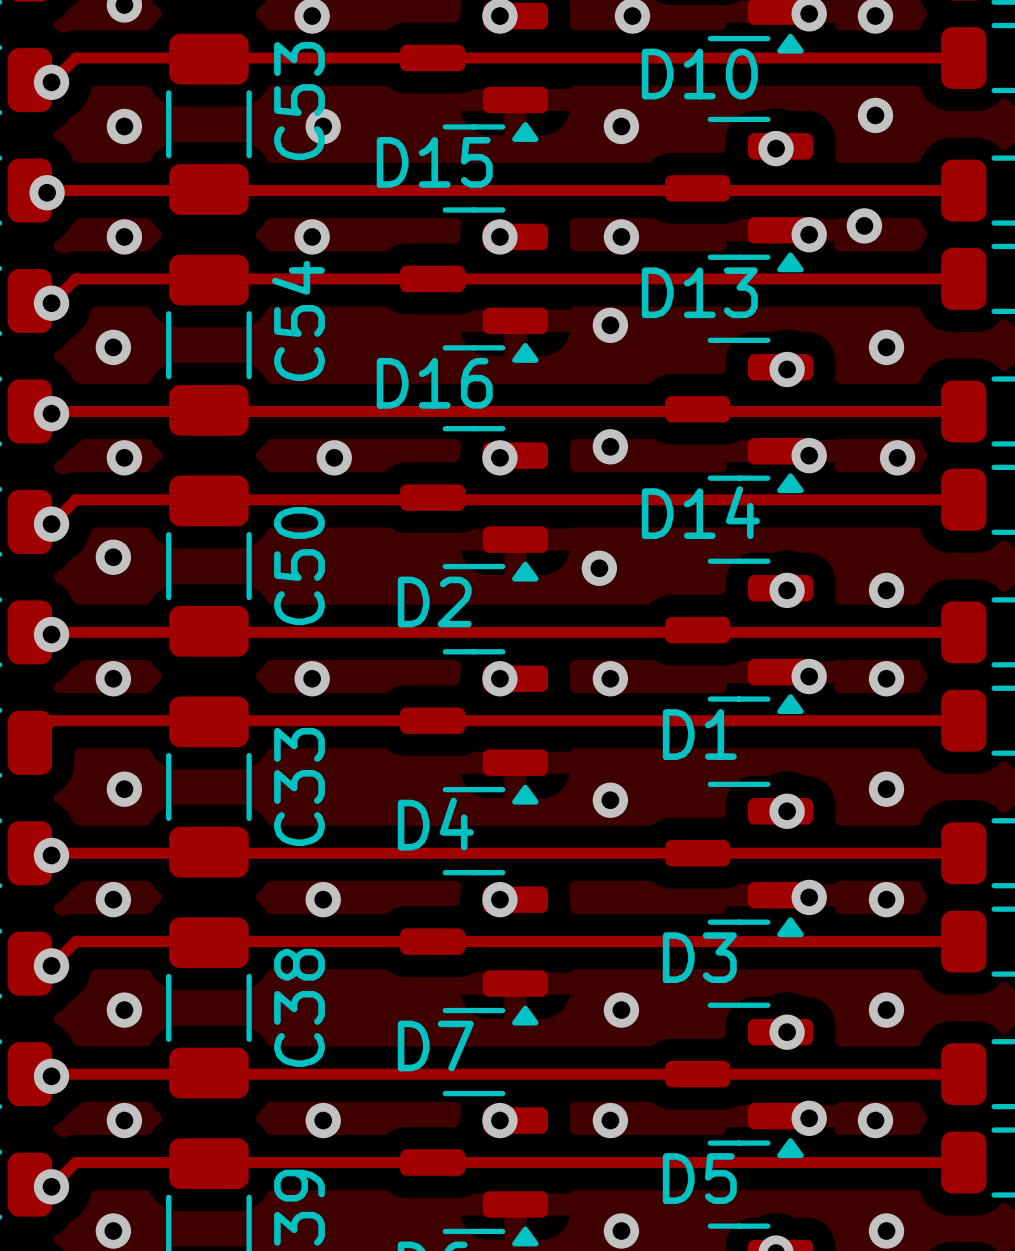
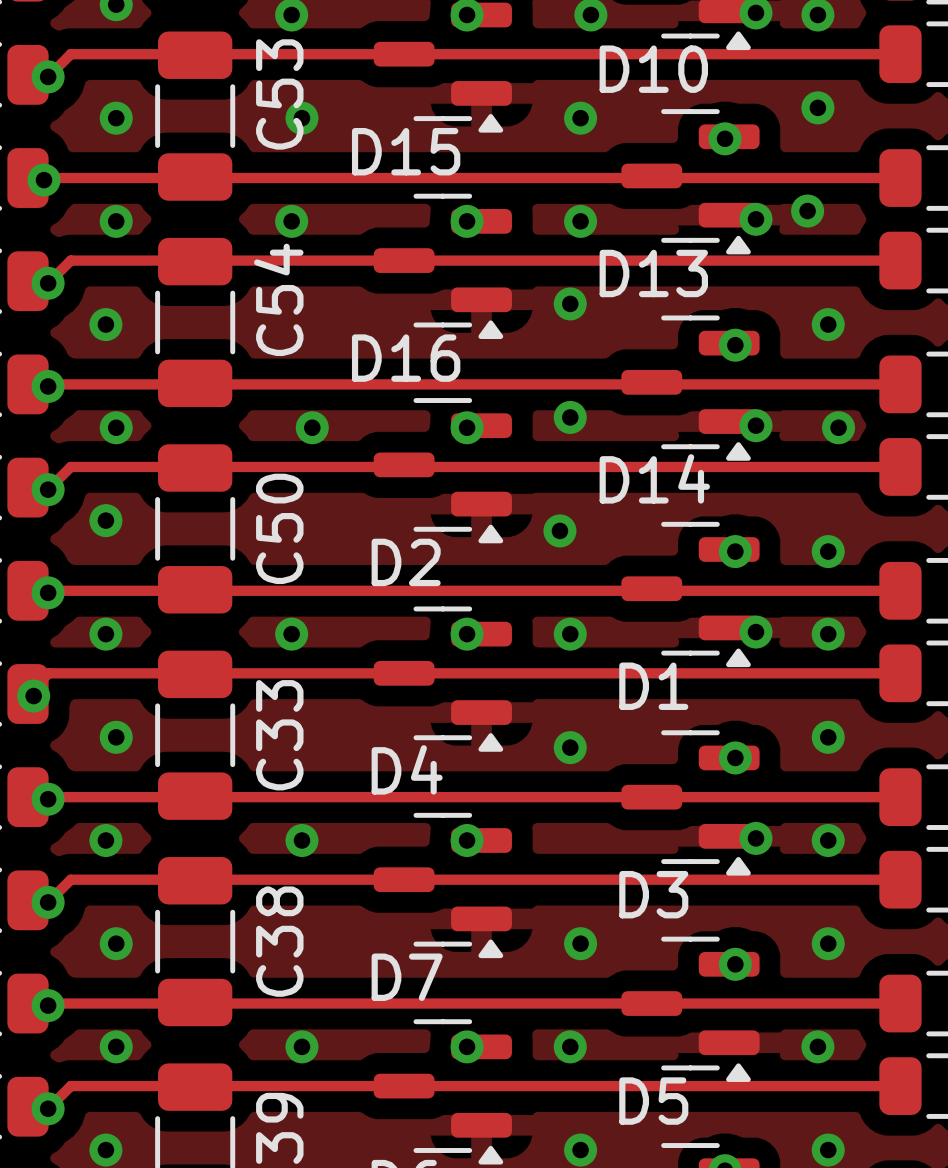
via: none -> (33, 696)
via: (809, 1118) -> none

